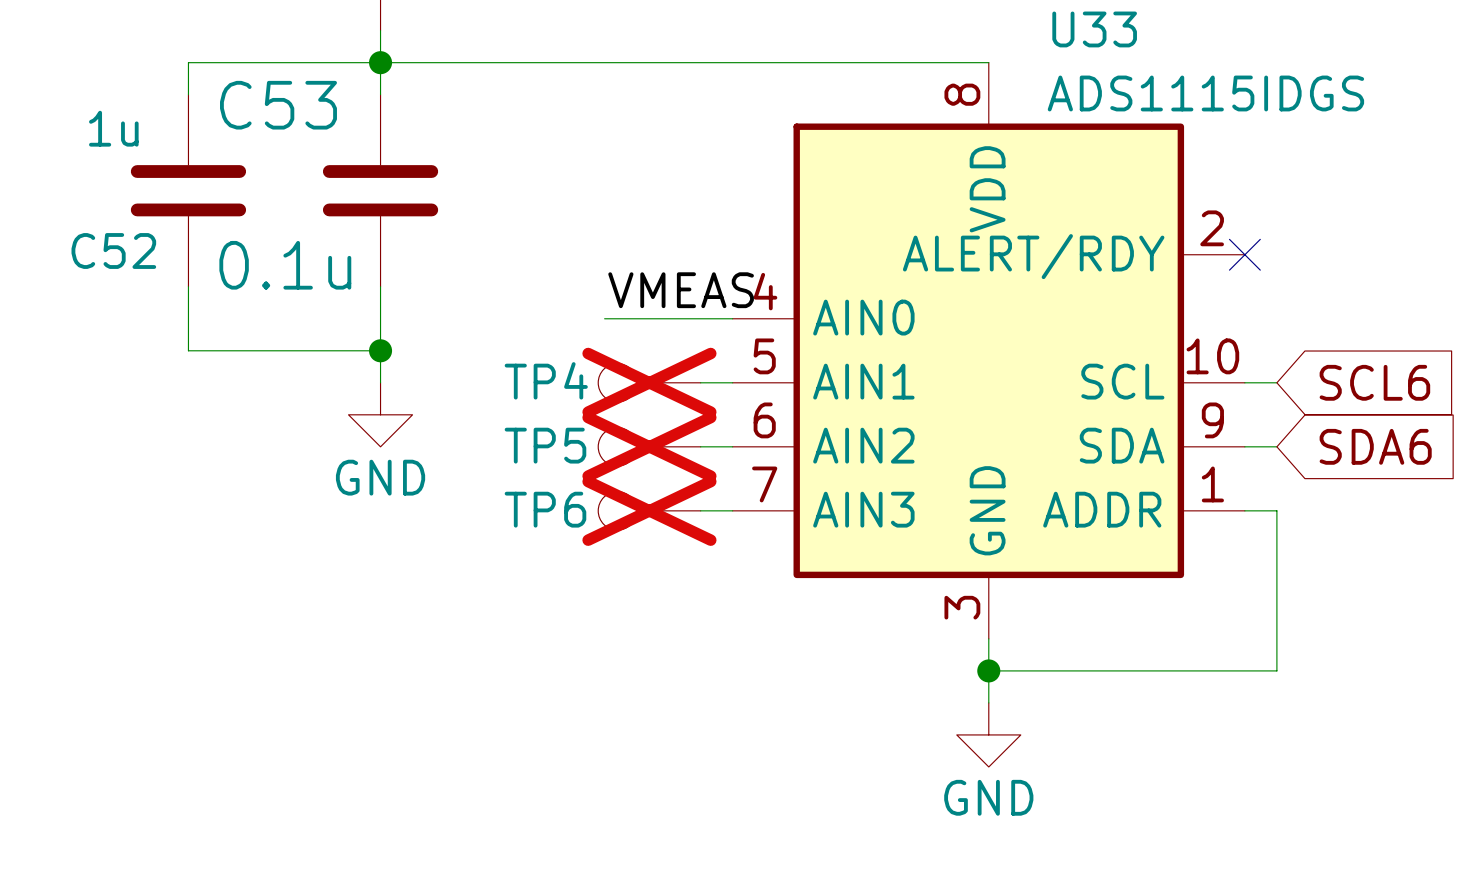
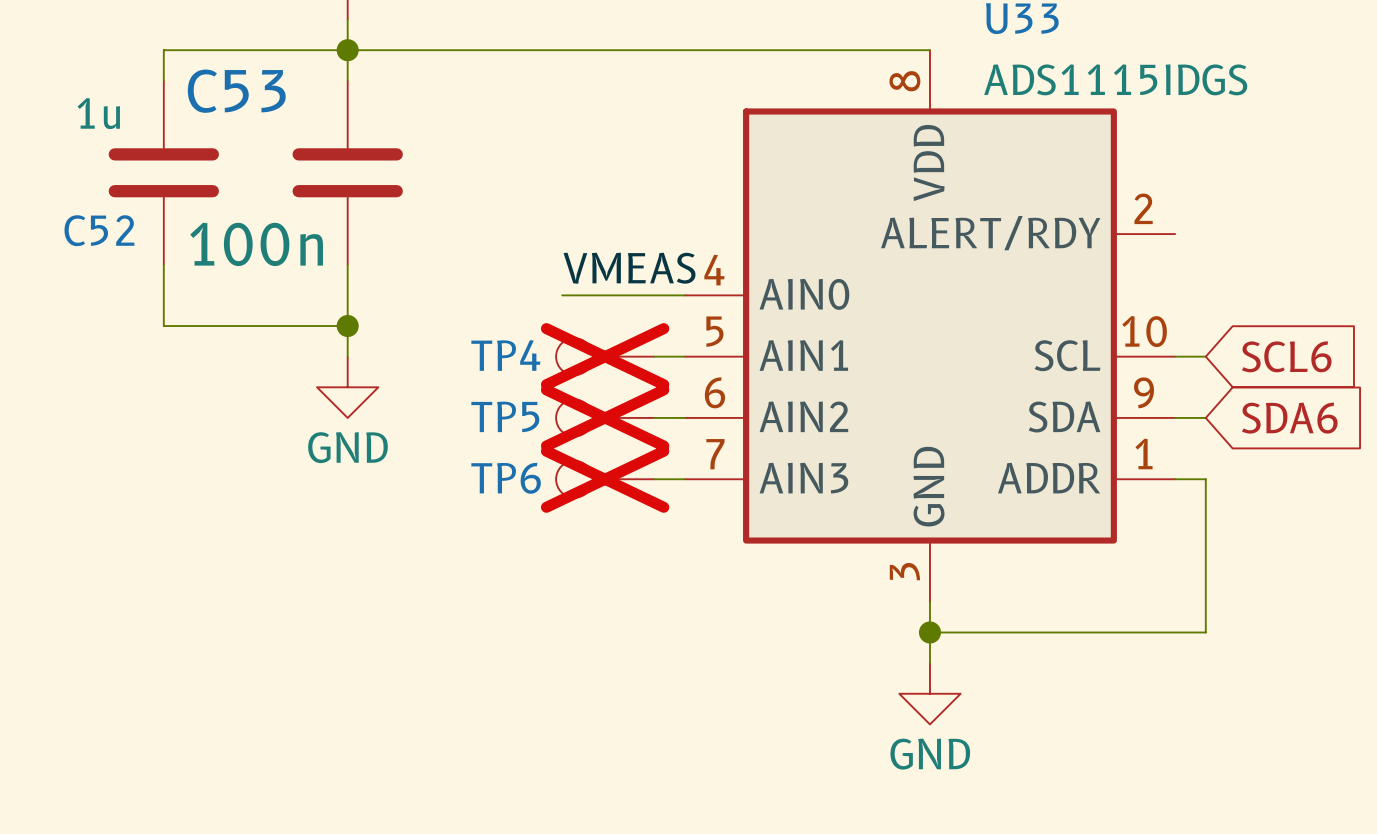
no-connect mark: (1244, 254) -> none
C53 value: 0.1u (285, 265) -> 100n (256, 244)

